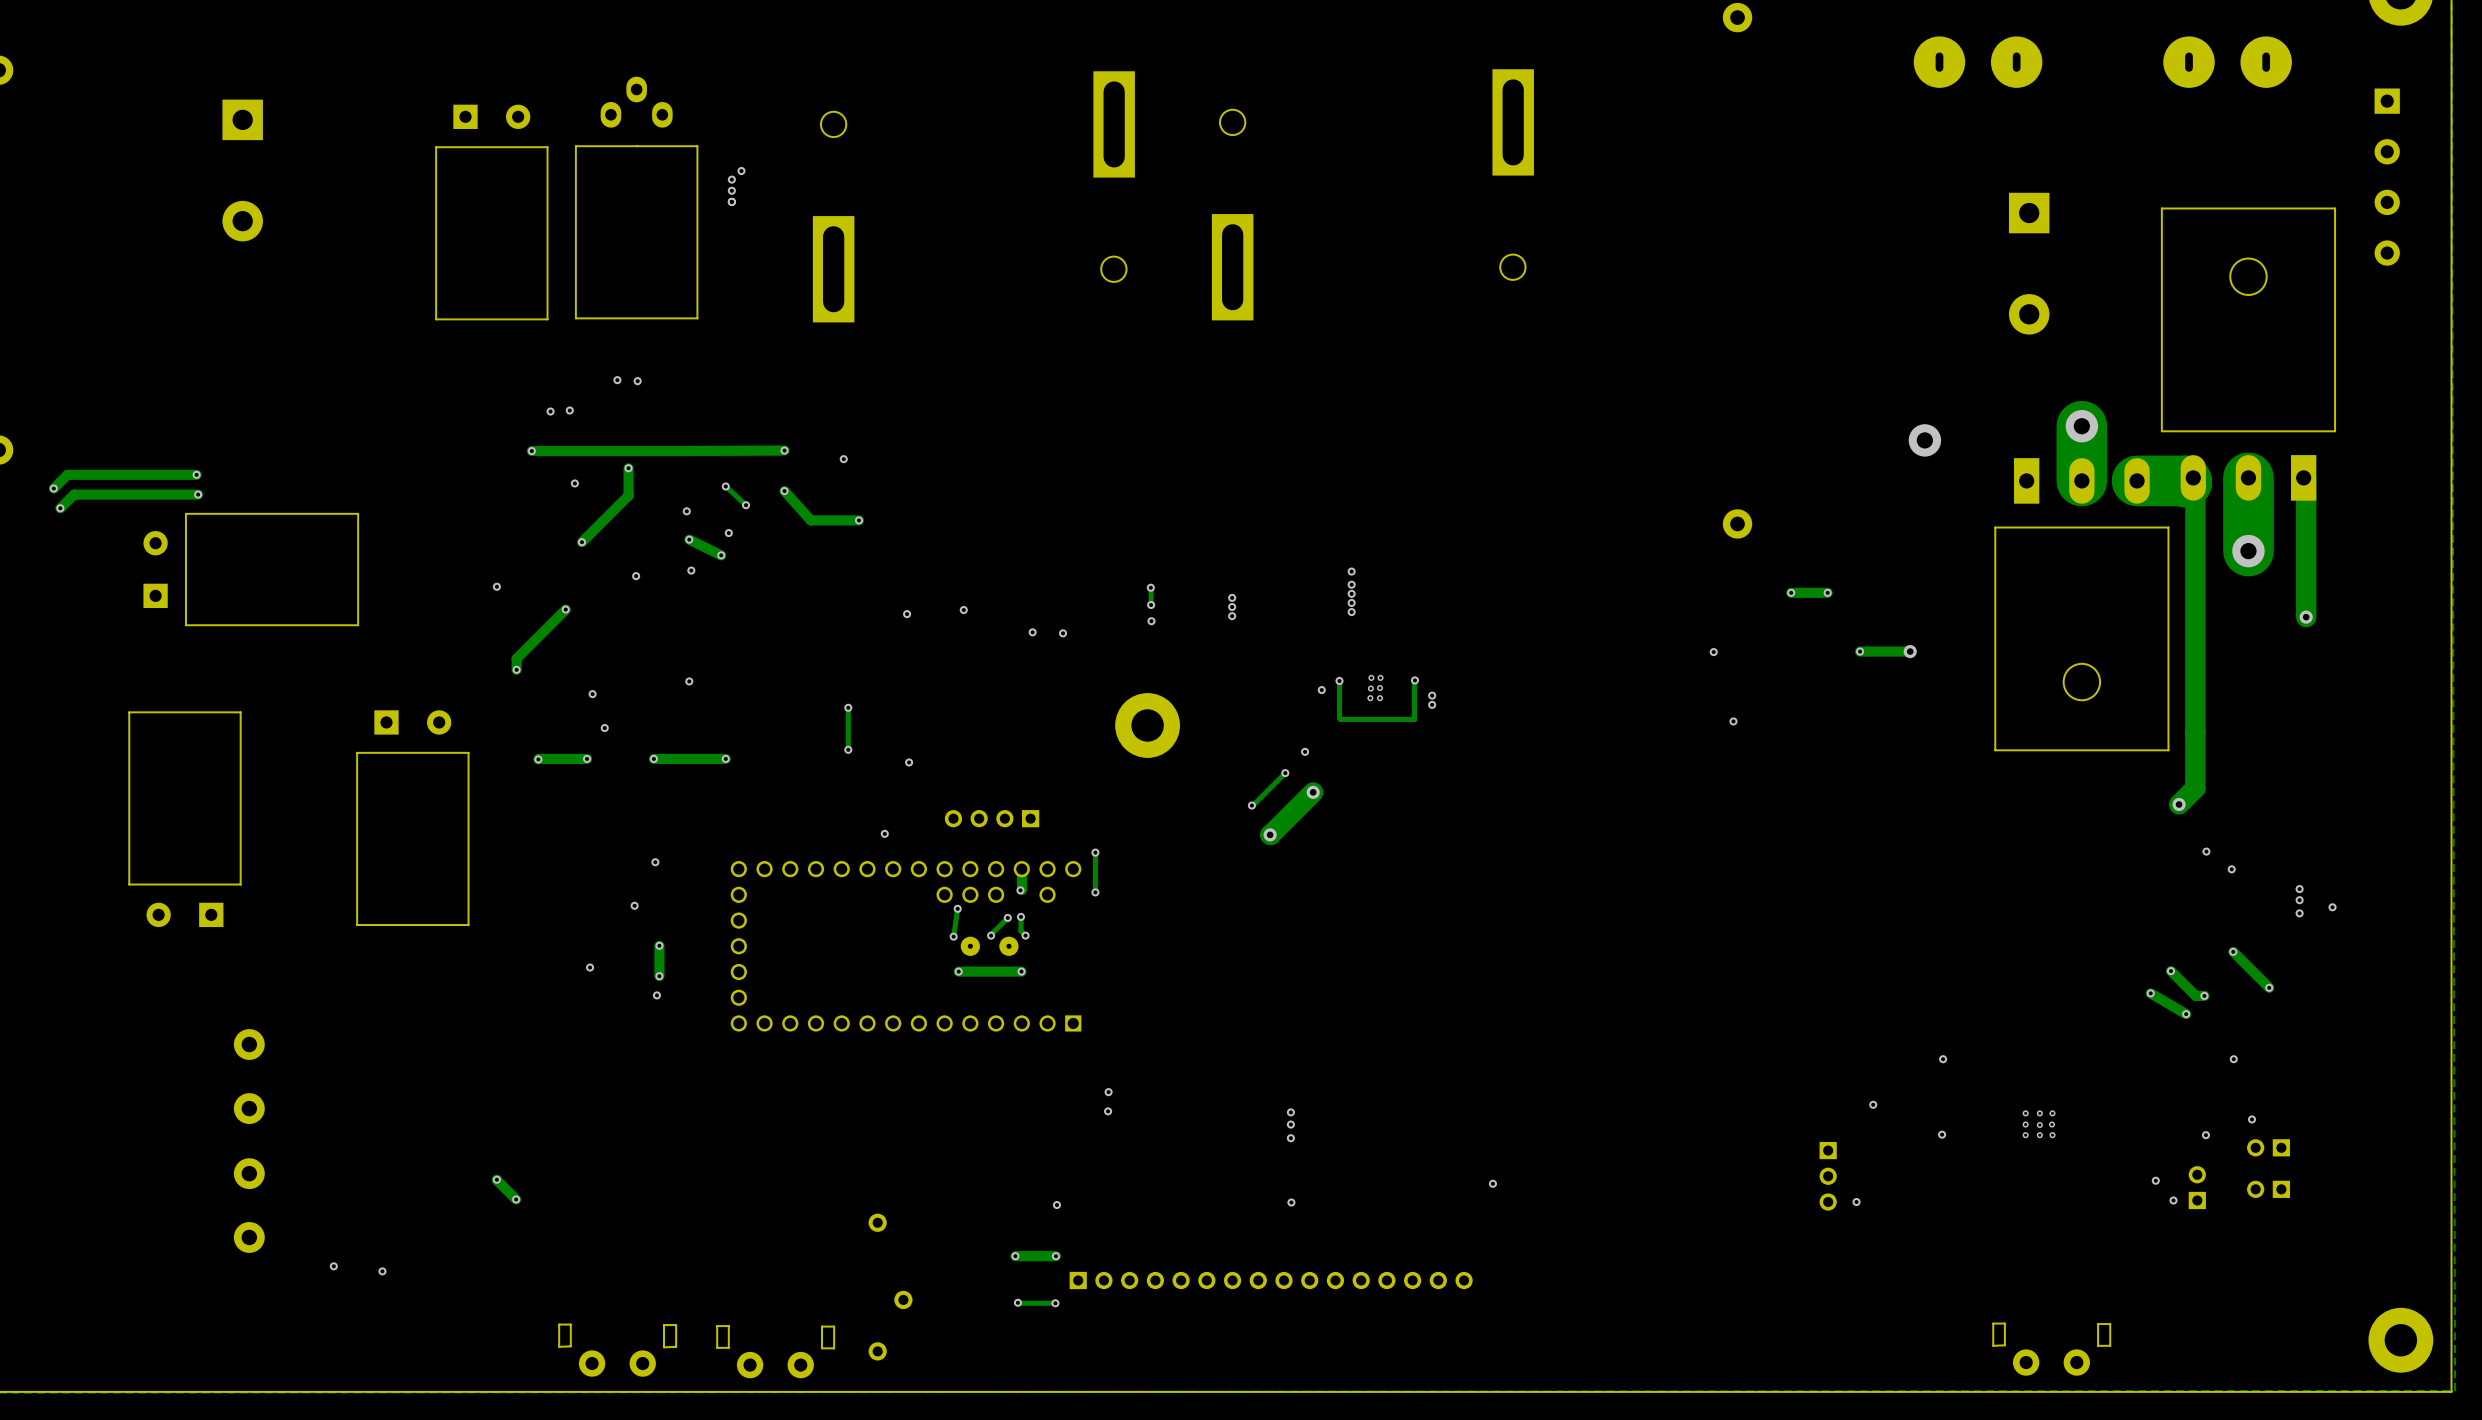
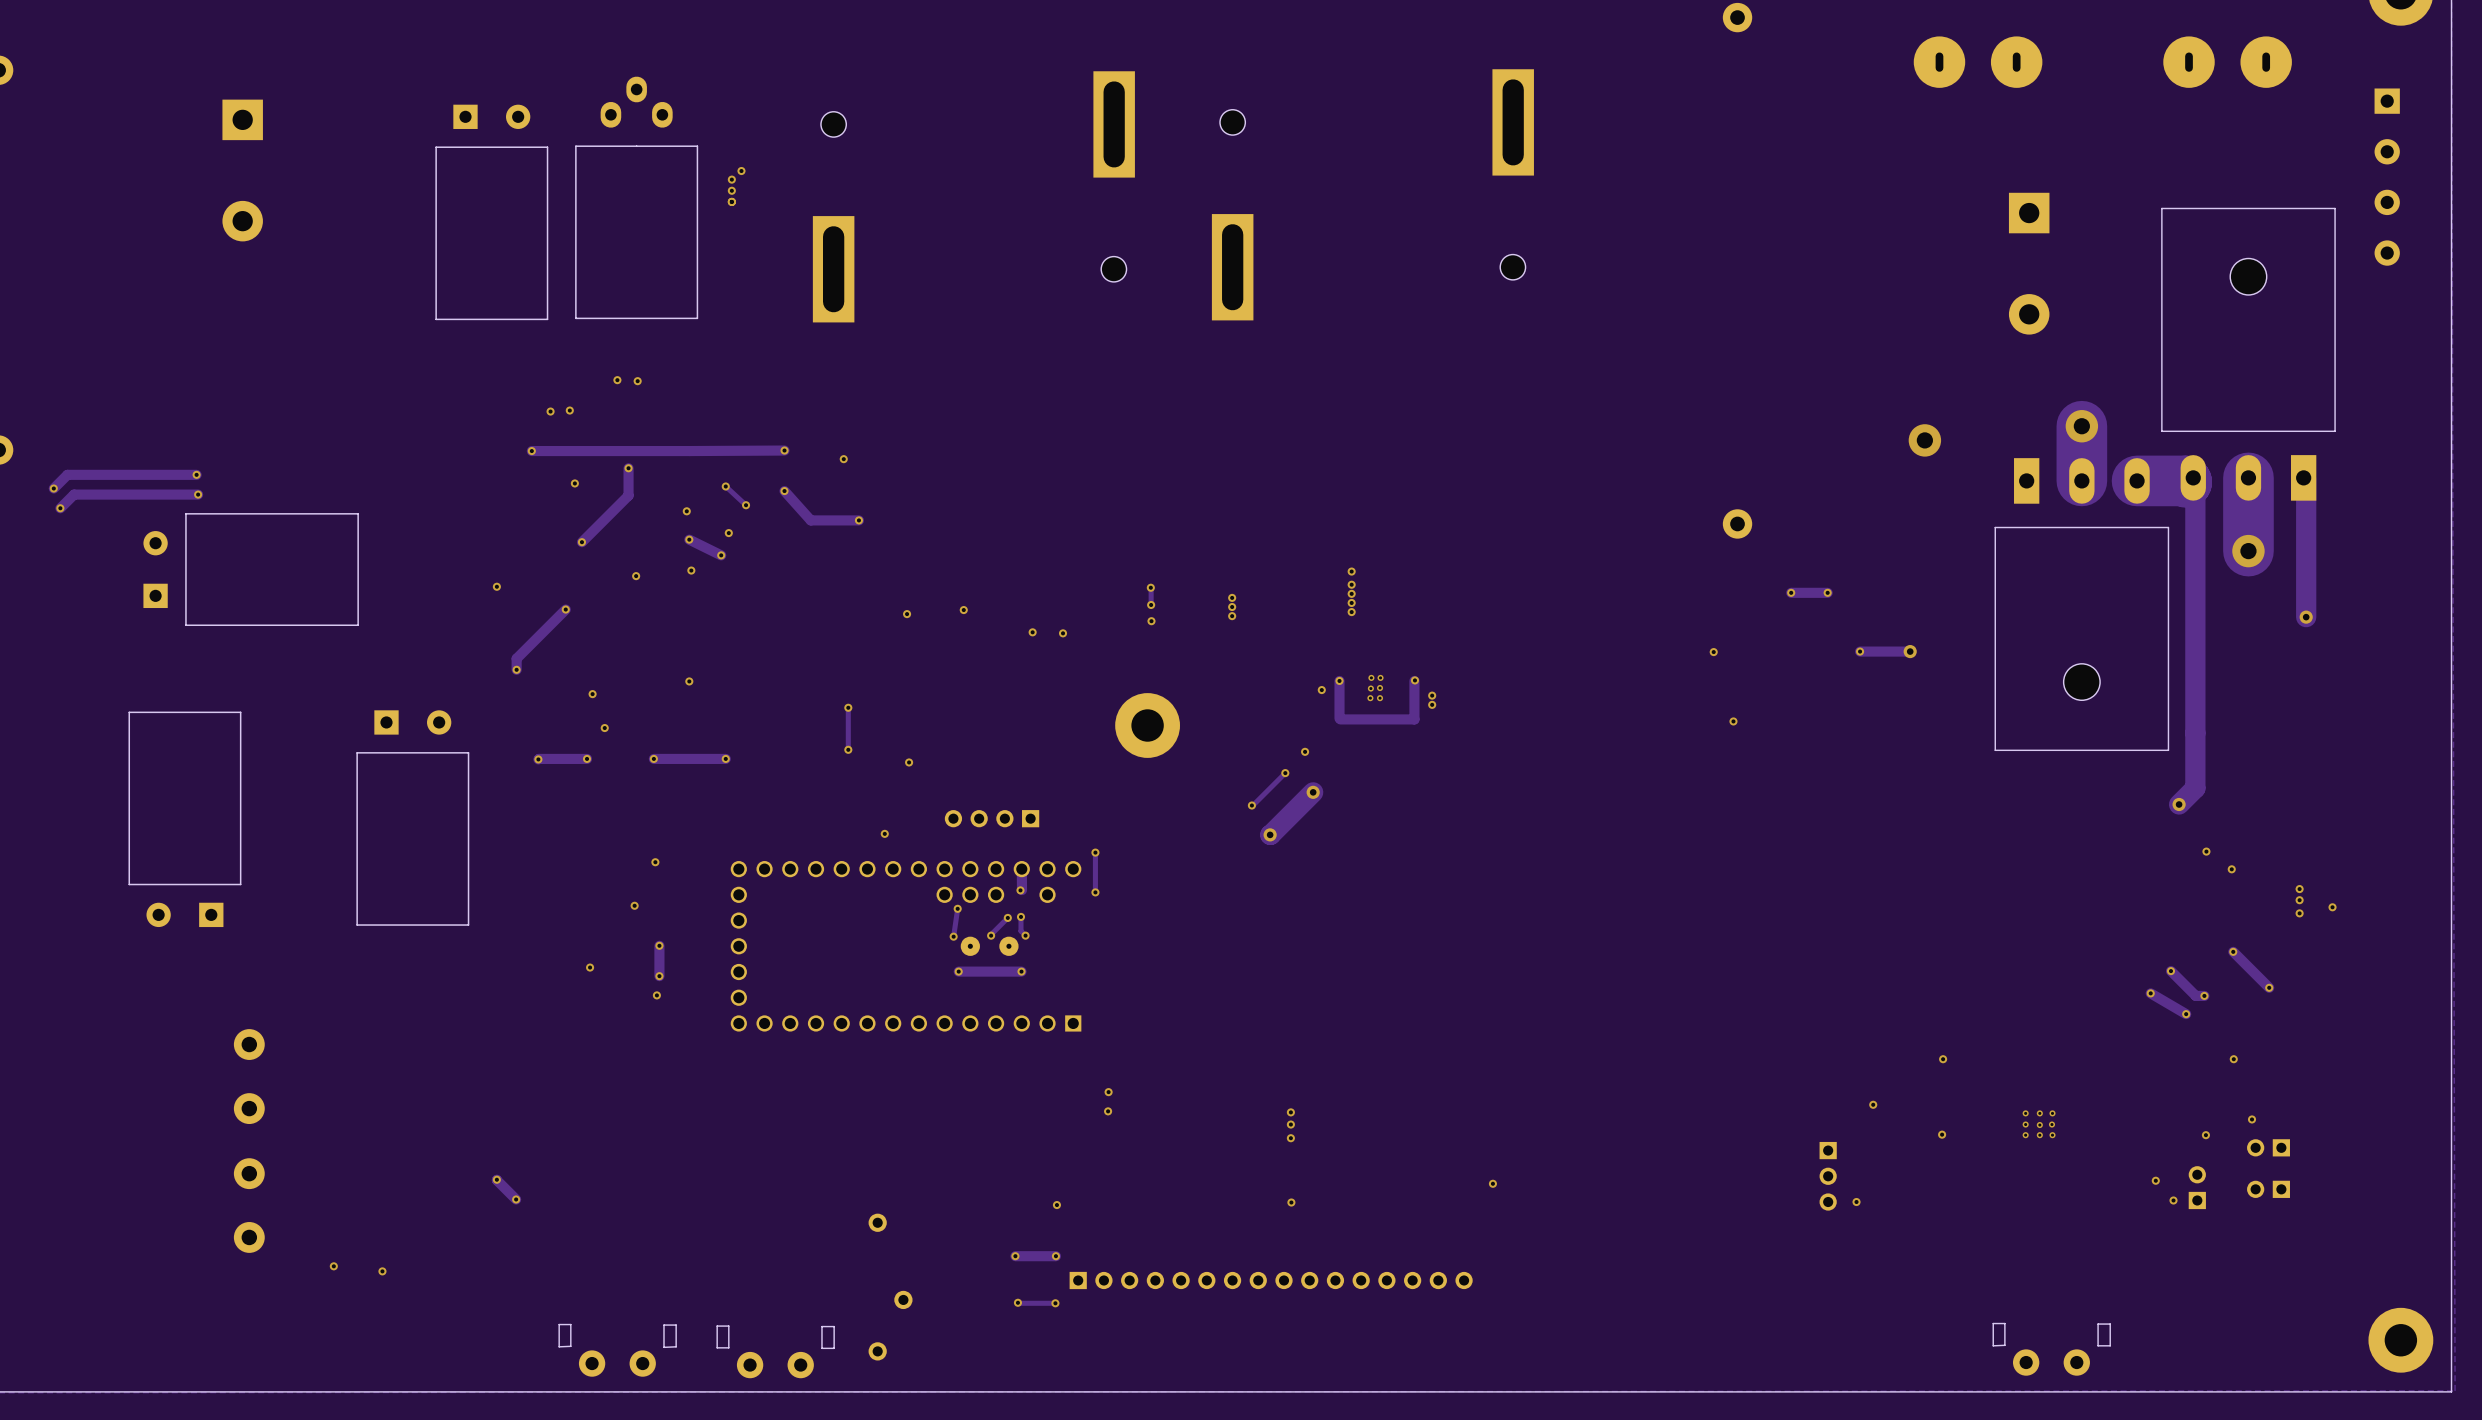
track width: thin (1339, 680) (1339, 718) -> thick (1339, 680) (1339, 718)
track width: thin (1414, 680) (1414, 719) (1340, 719) -> thick (1414, 680) (1414, 719) (1340, 719)

